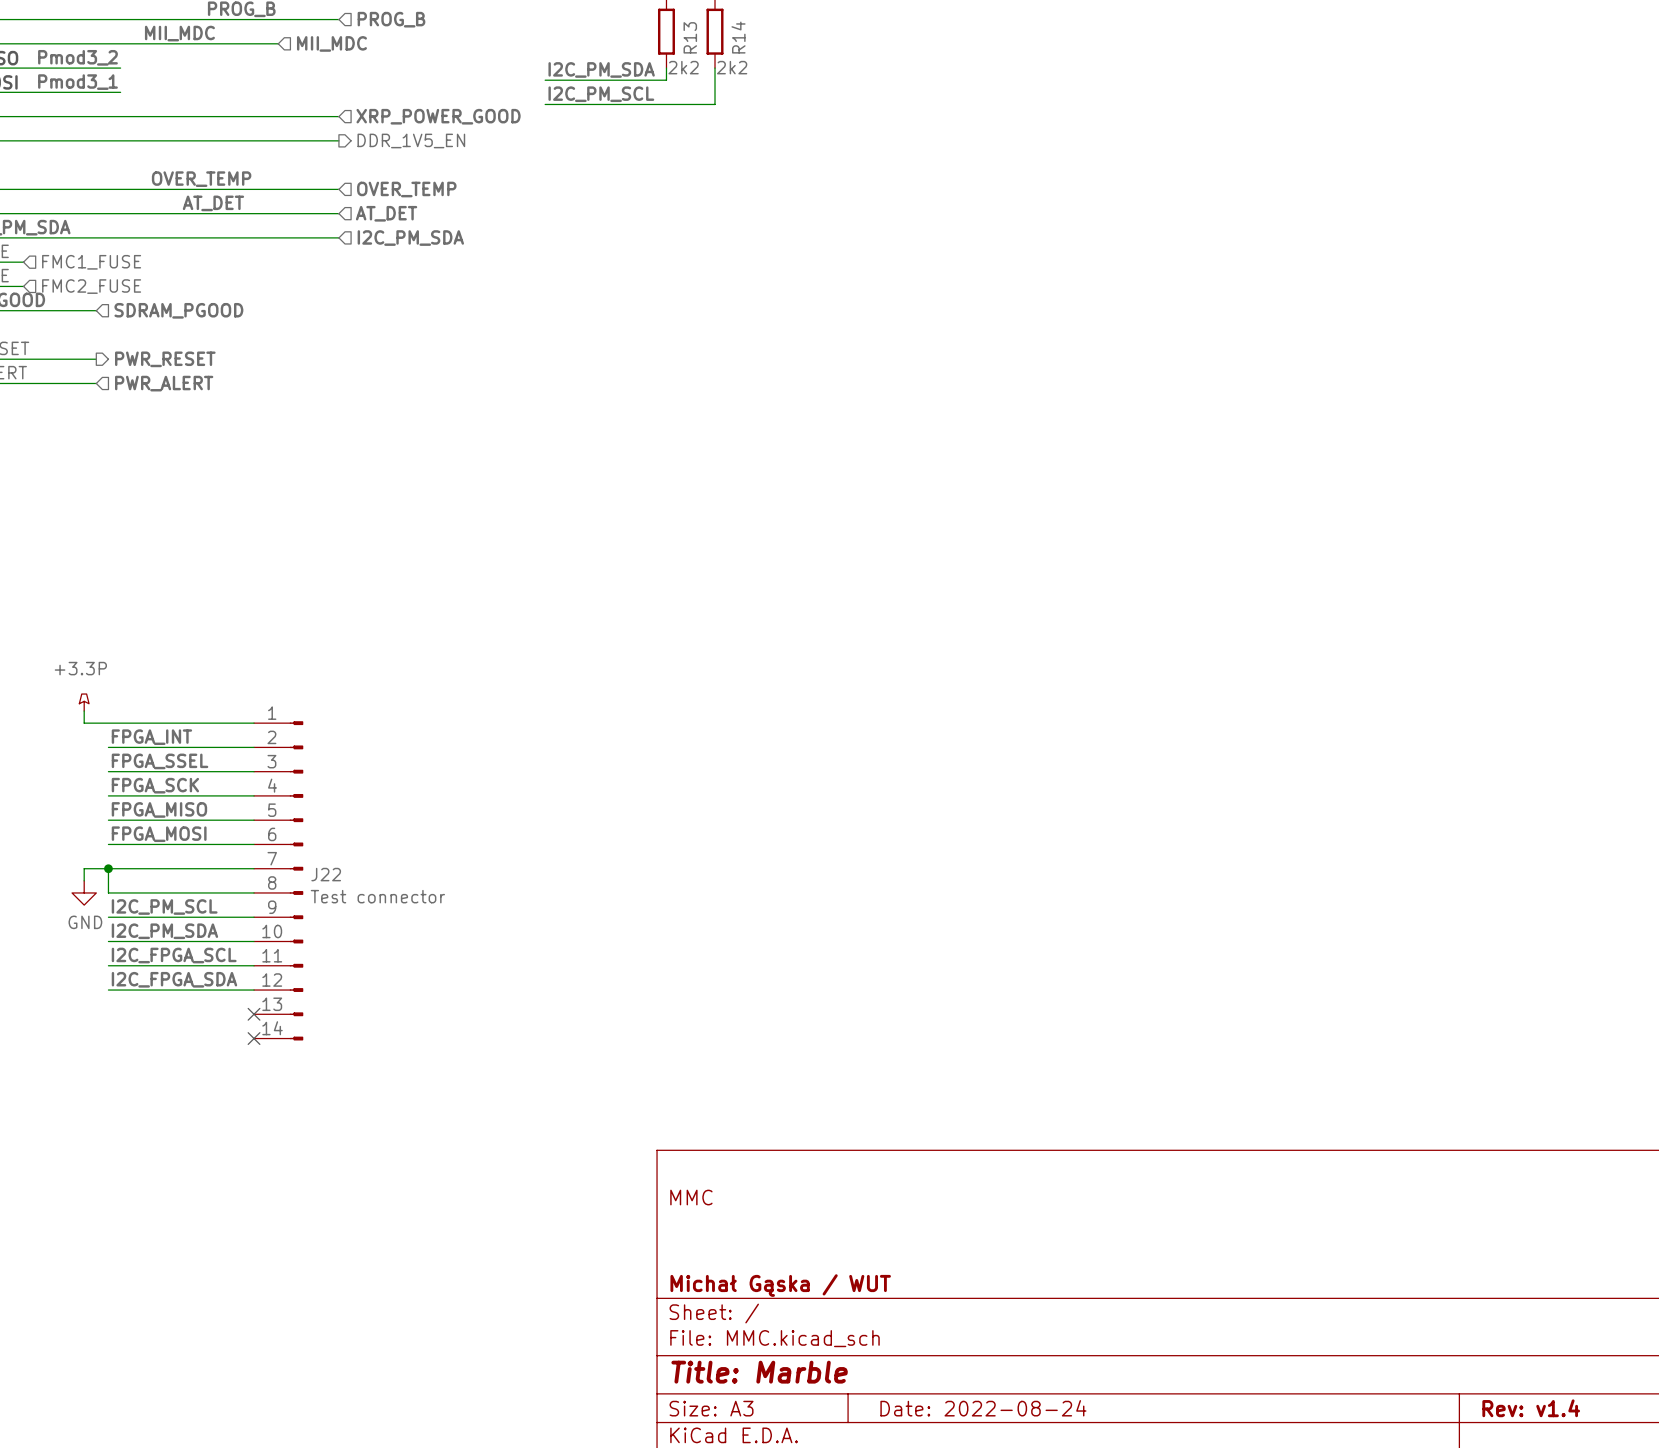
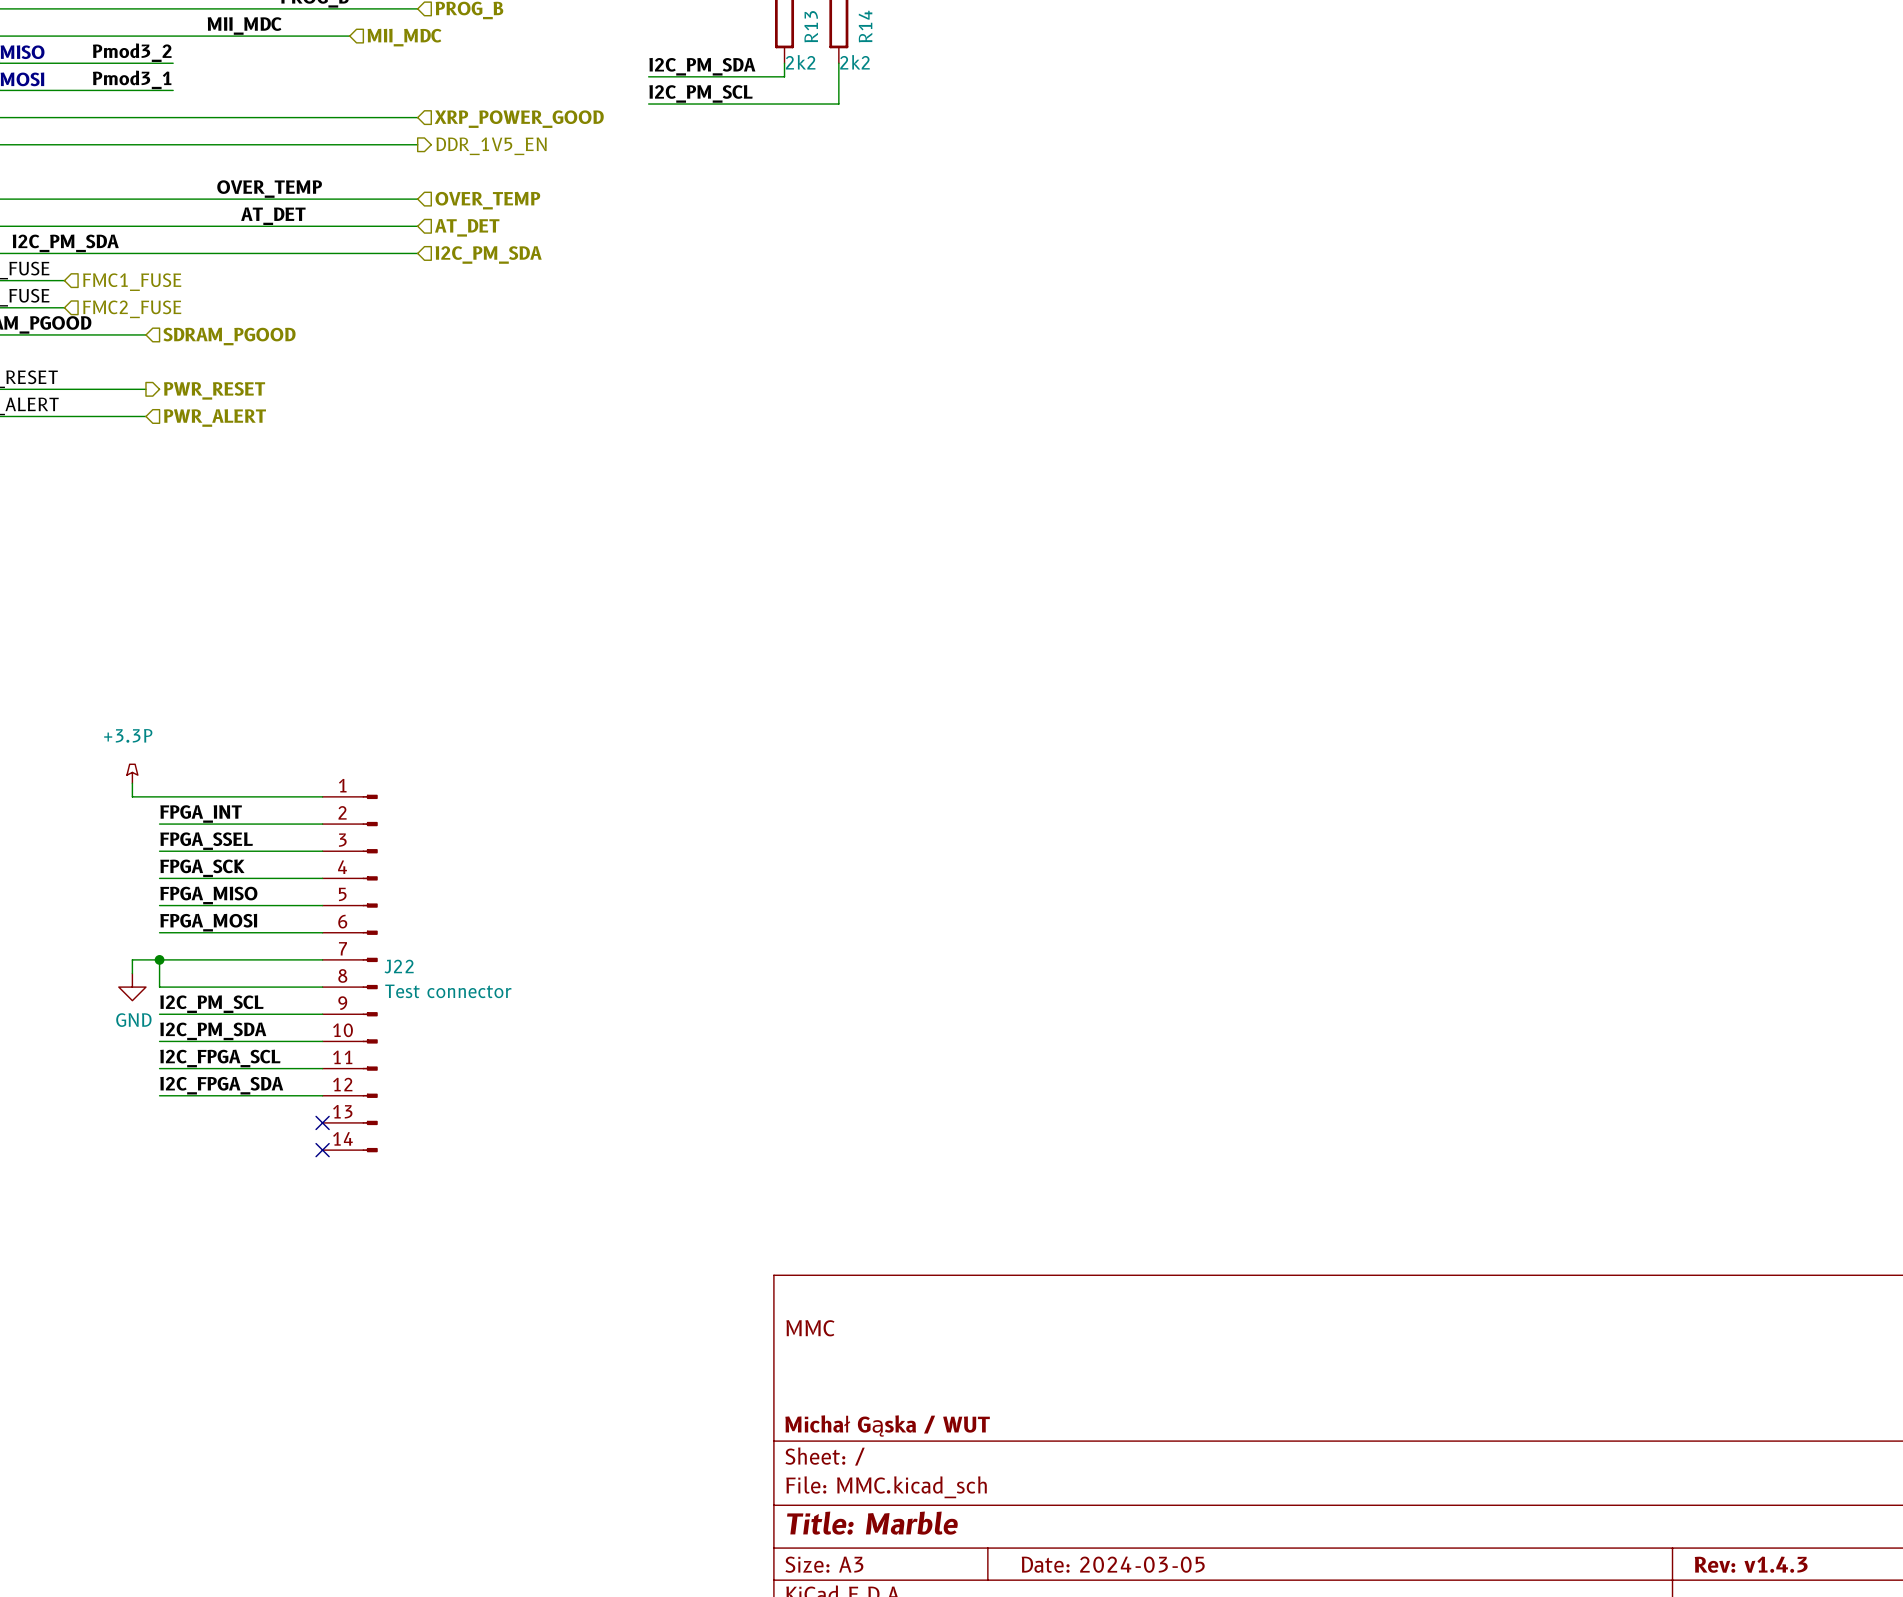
title block: Date: 2022-08-24 (983, 1408) -> Date: 2024-03-05 (1113, 1564)
title block: Rev: v1.4 (1531, 1408) -> Rev: v1.4.3 (1751, 1564)

